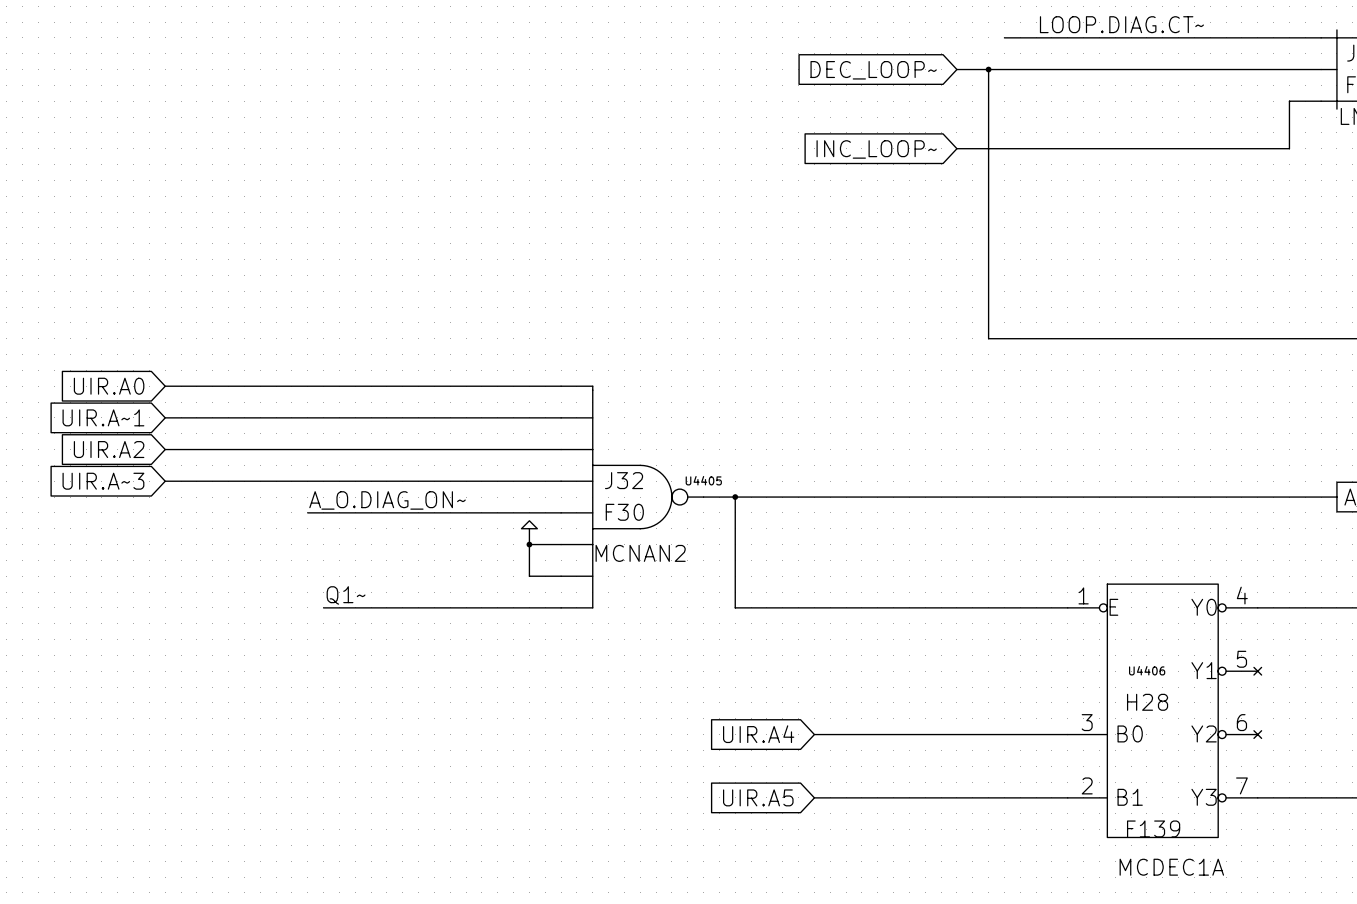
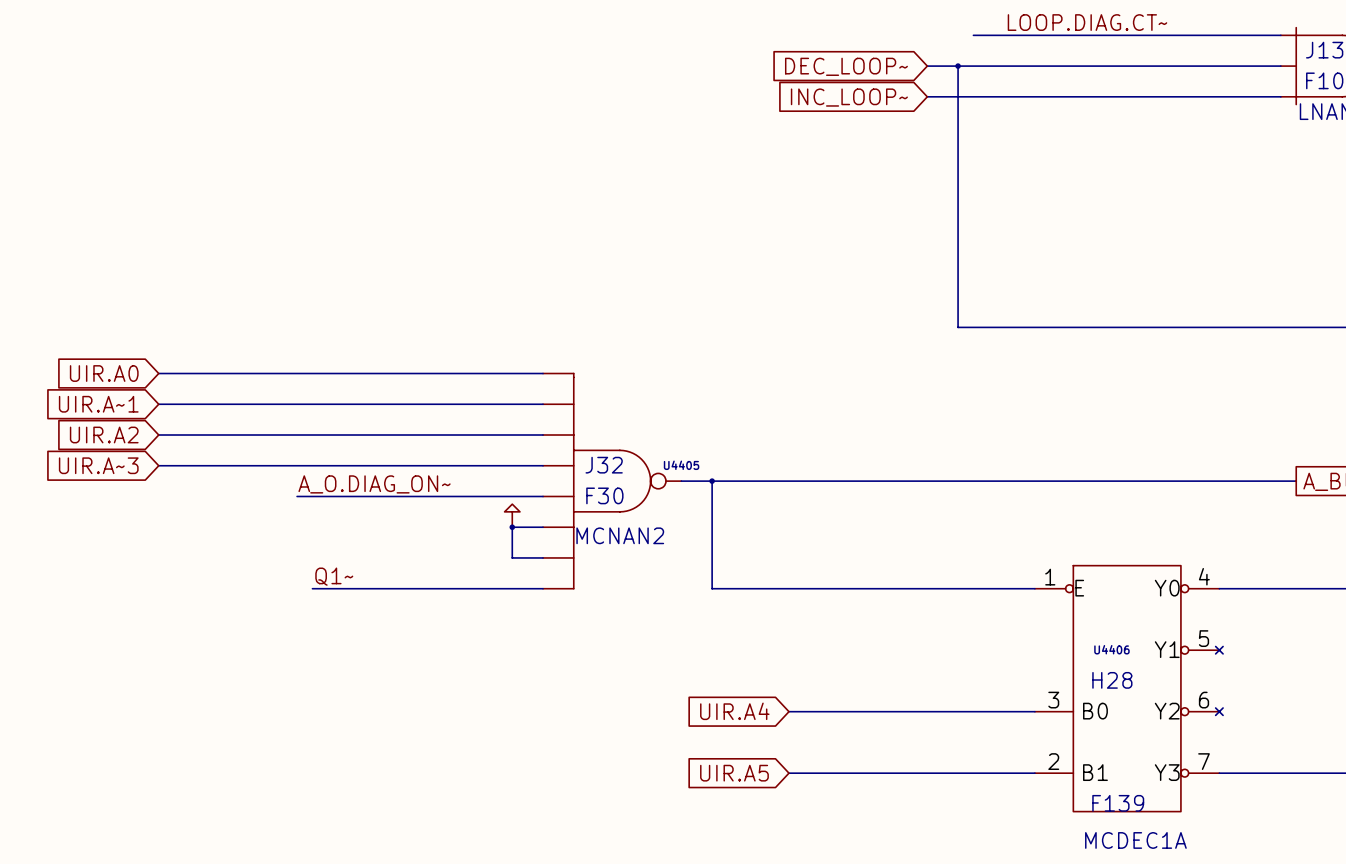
wire: (1289, 101) (1289, 148) (956, 148) -> (1250, 96) (927, 96)
global label position: INC_LOOP~ (876, 149) -> INC_LOOP~ (849, 97)

